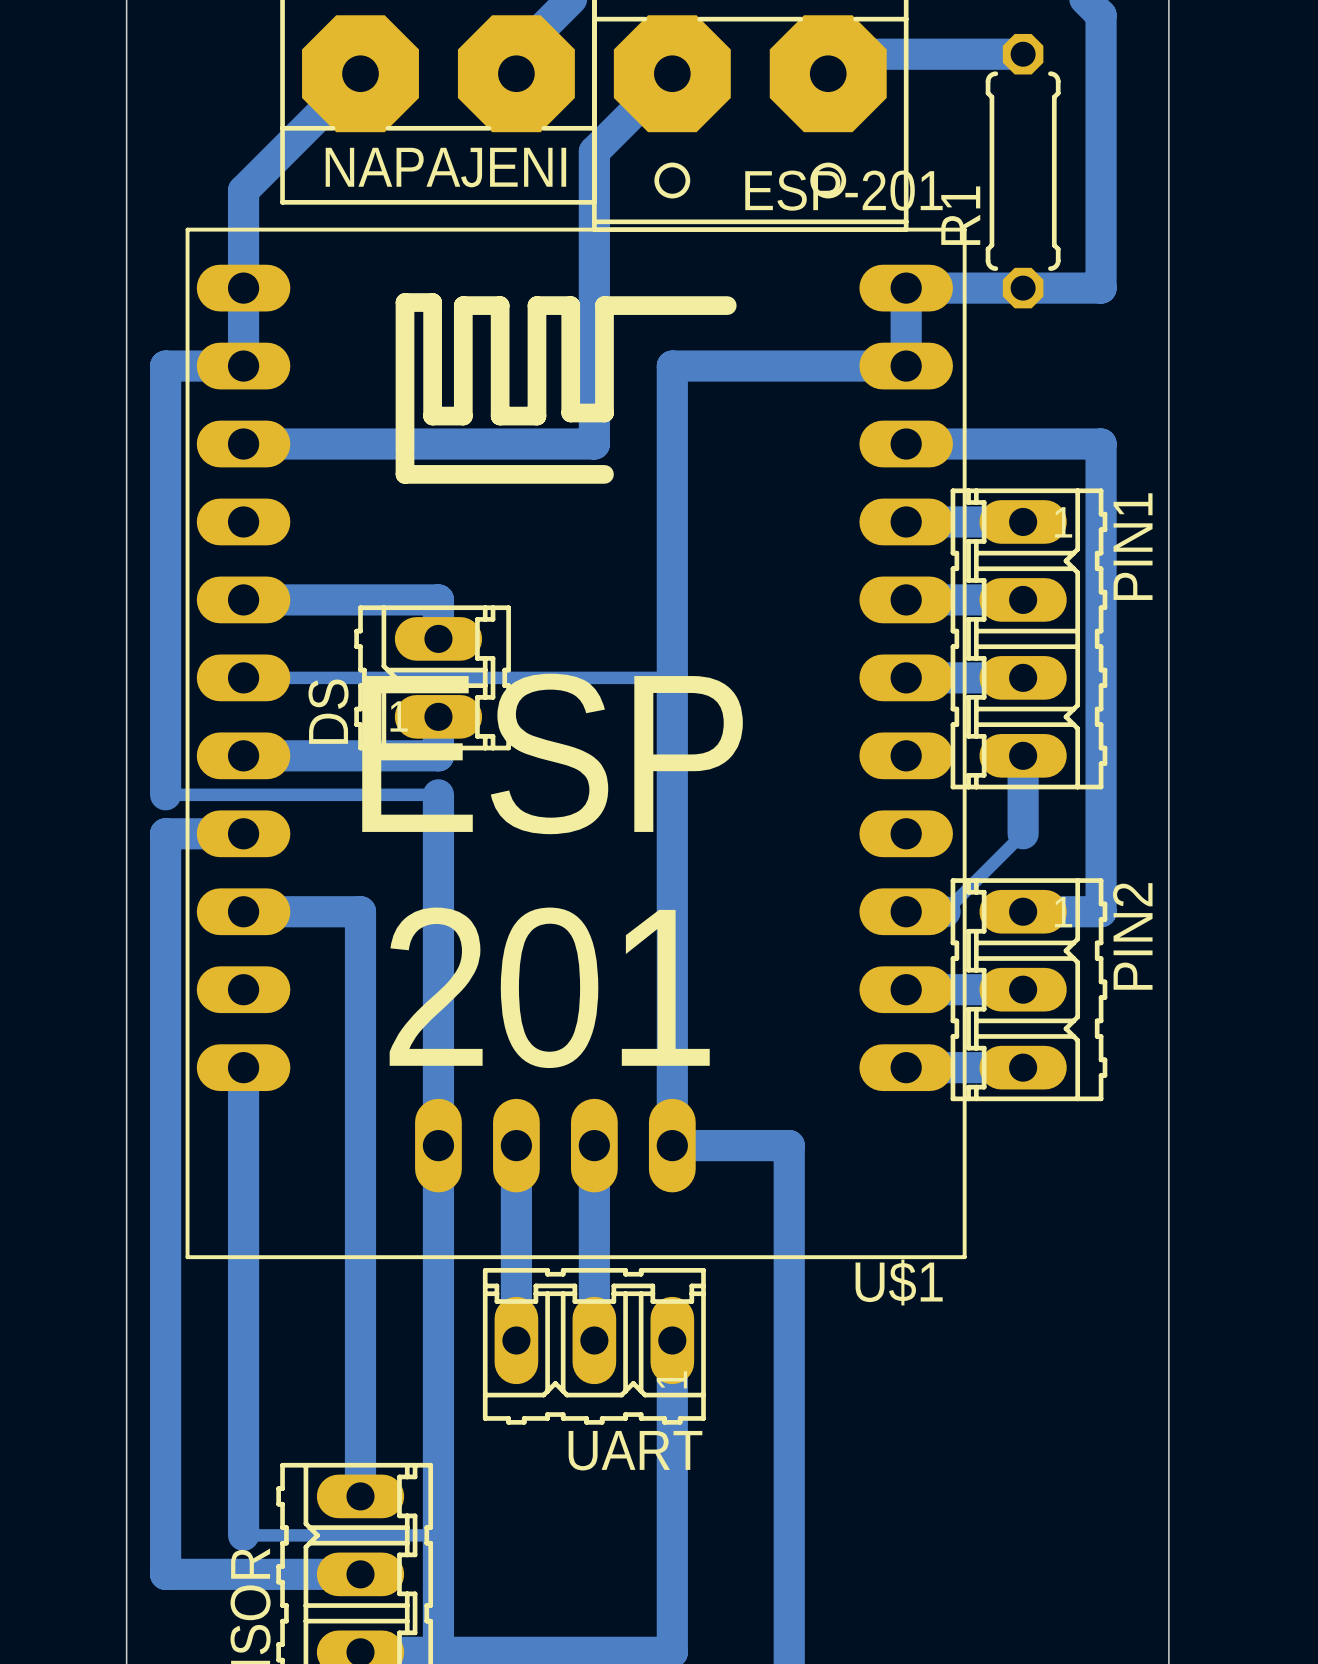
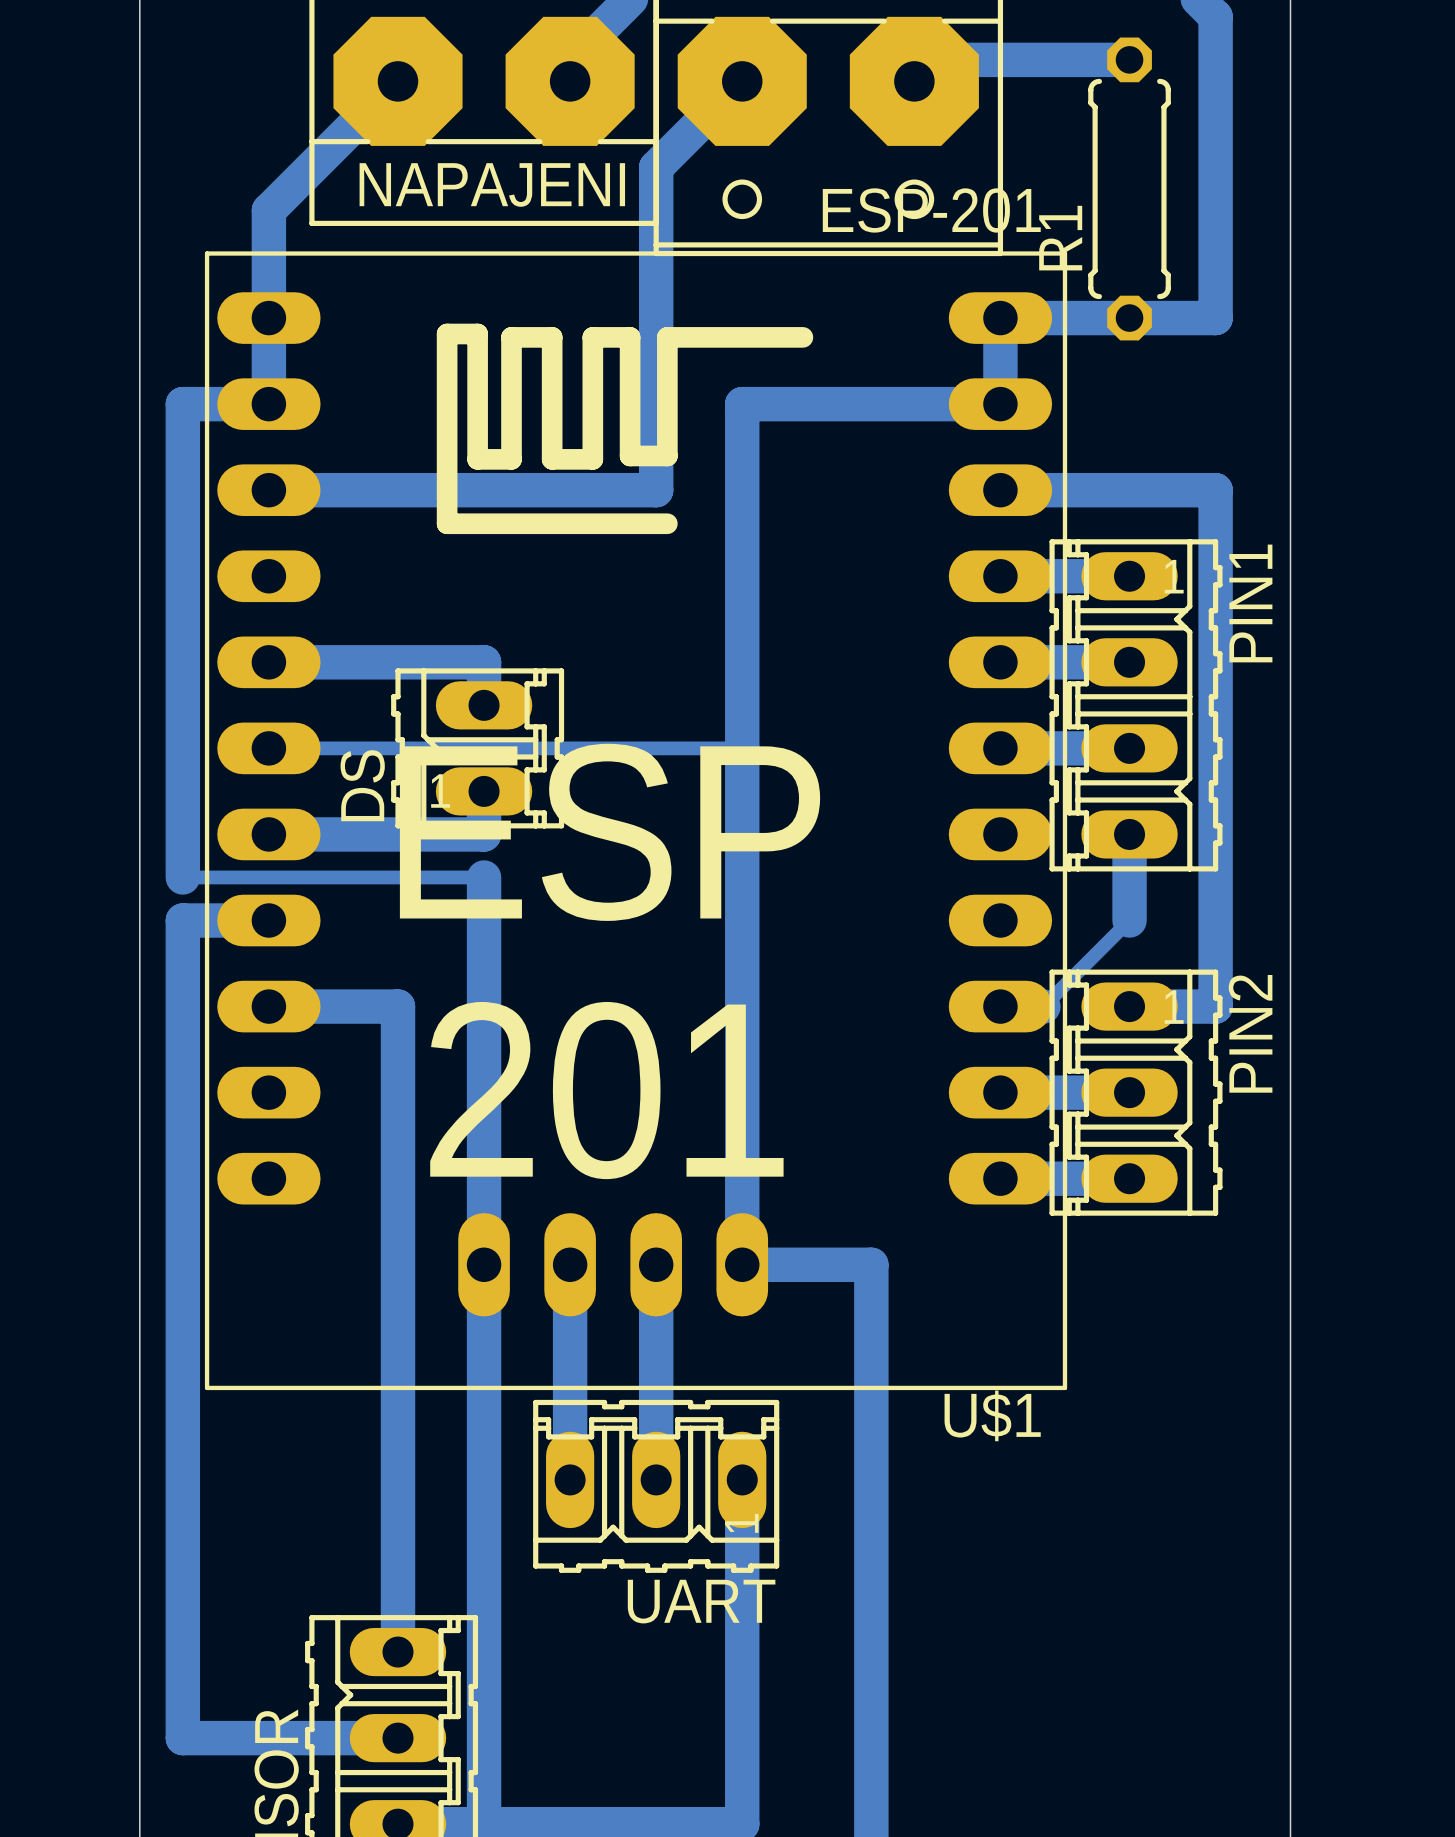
bottom track: (243, 1067) (243, 1535) (438, 1535) -> none

